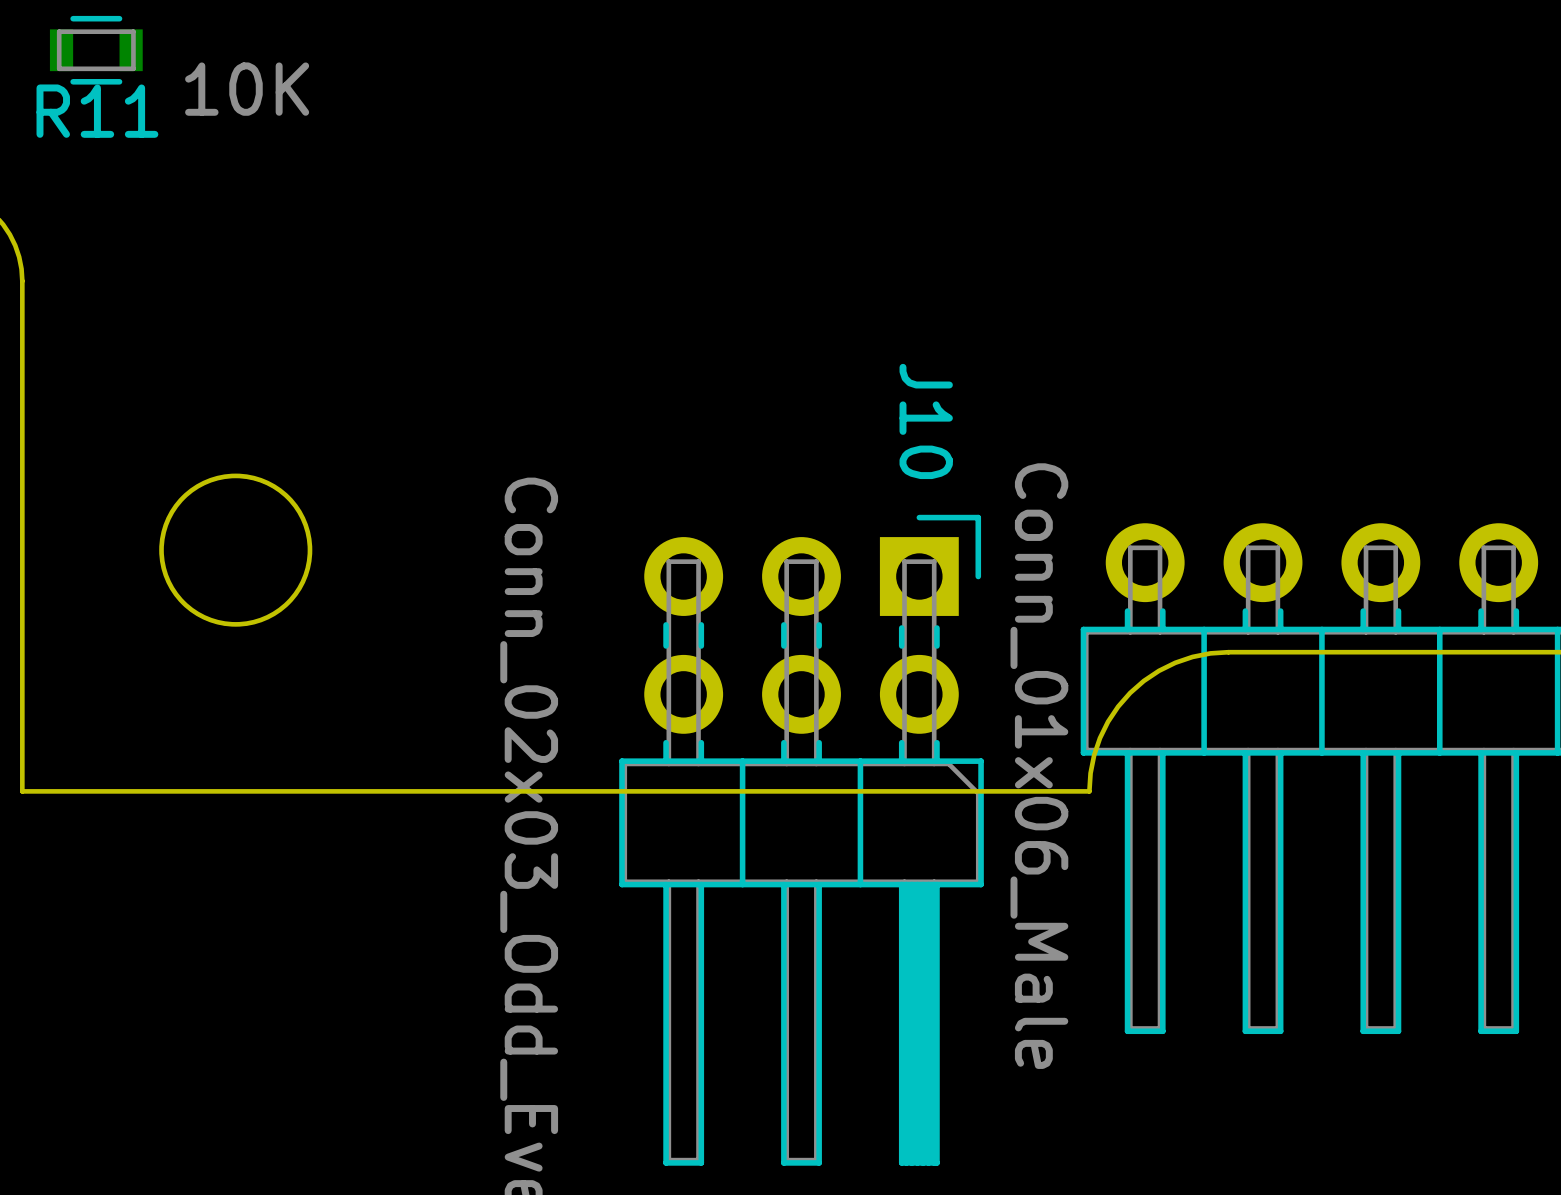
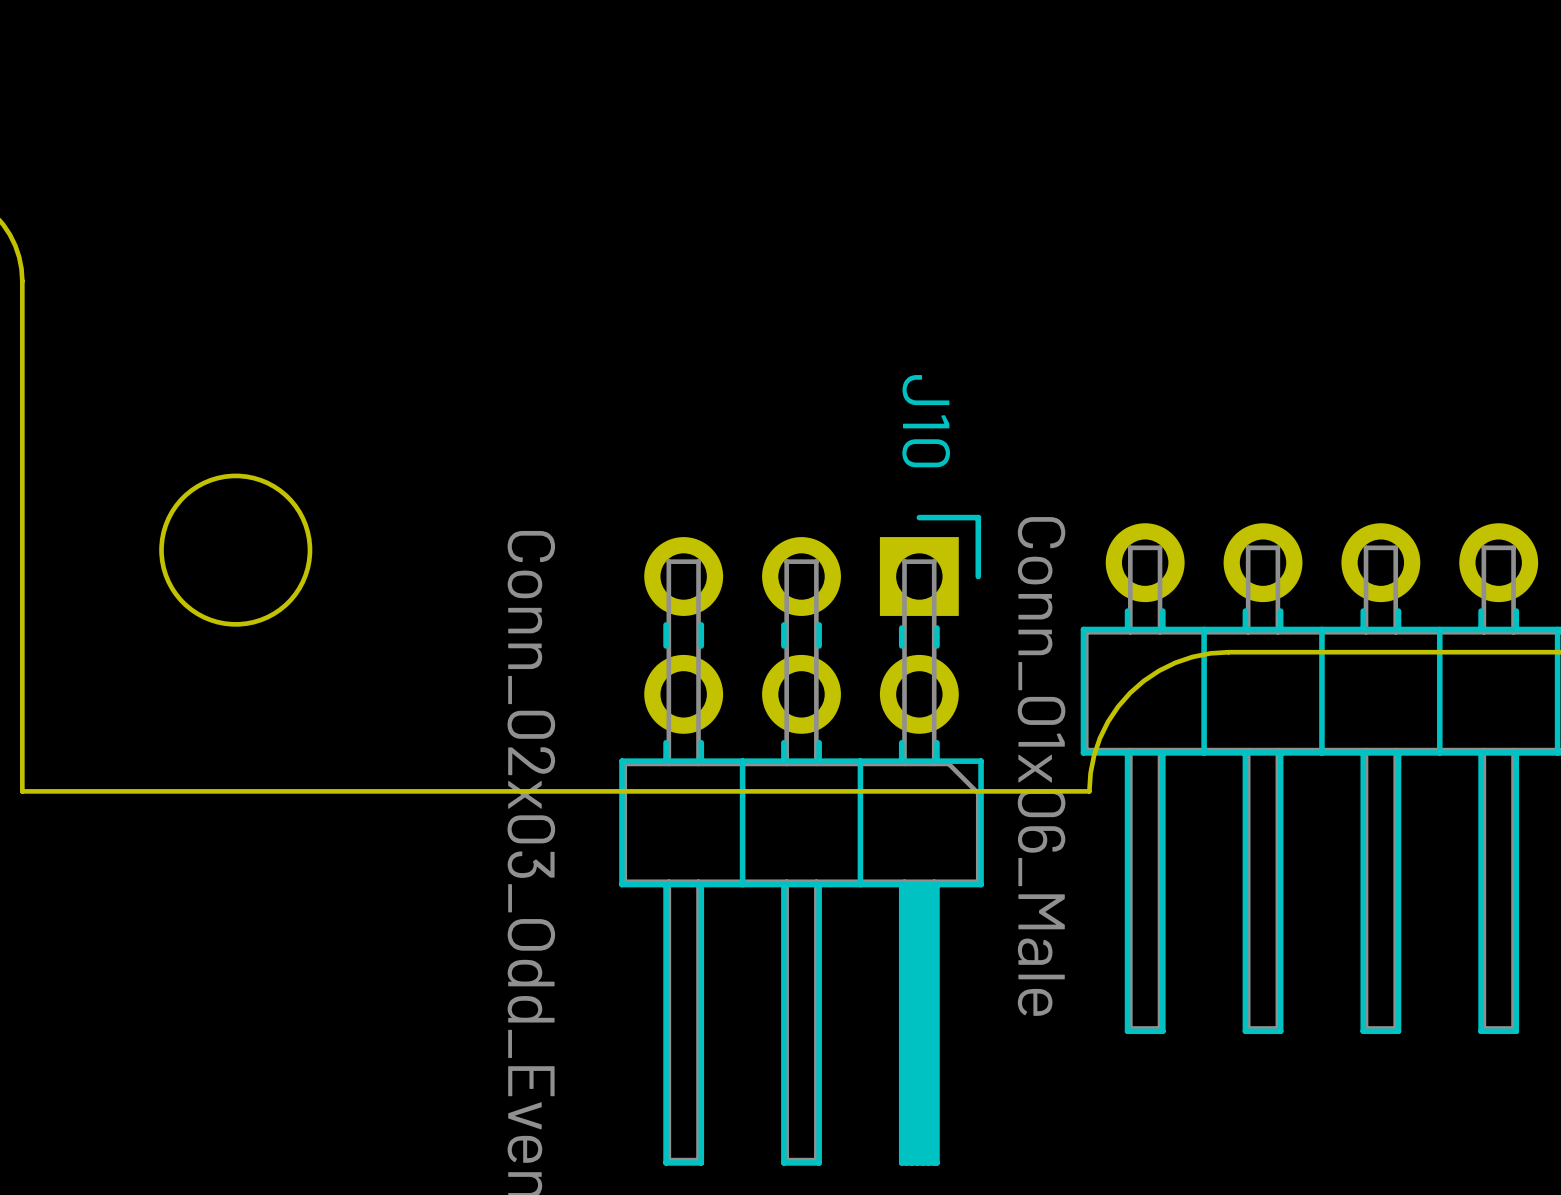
R11: 10K (96, 50) -> none

